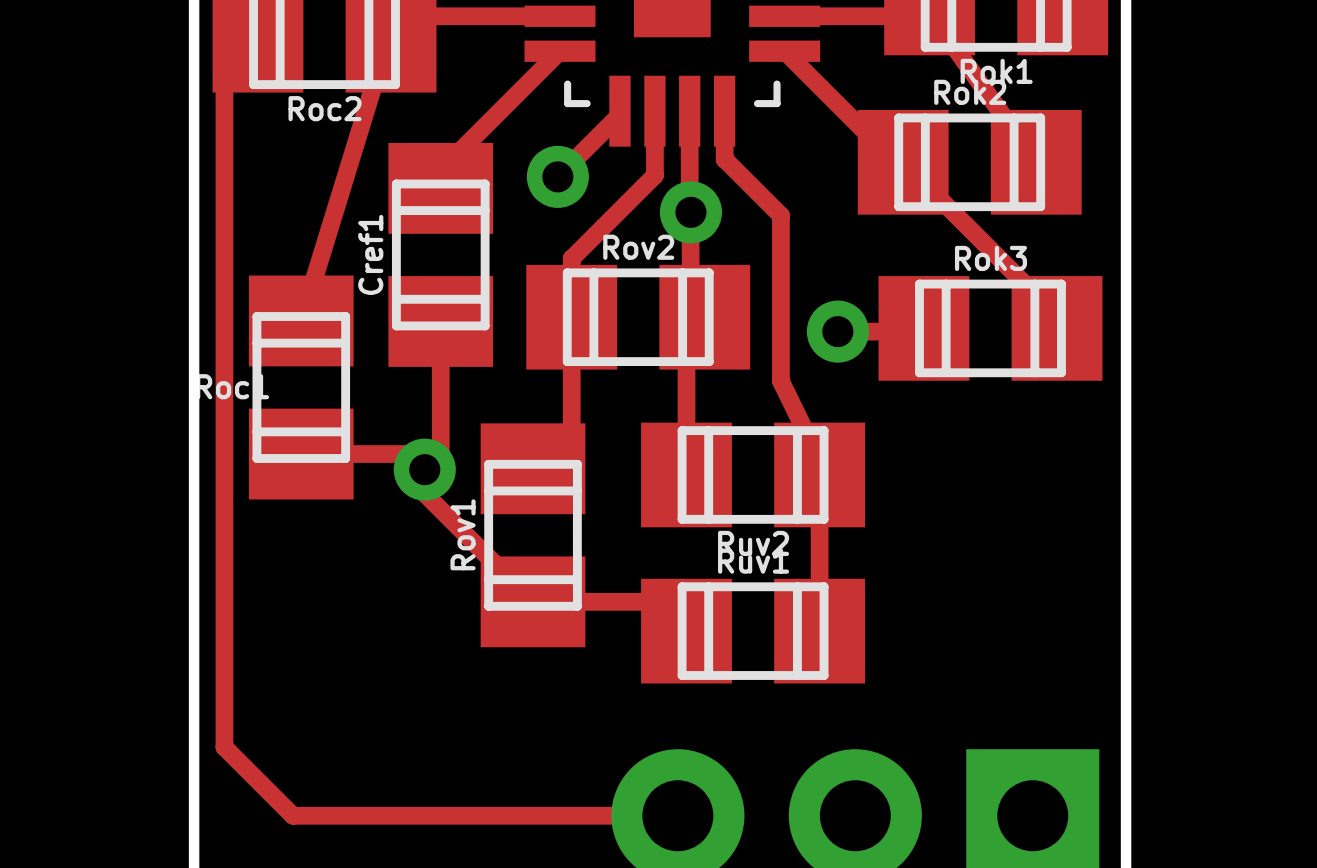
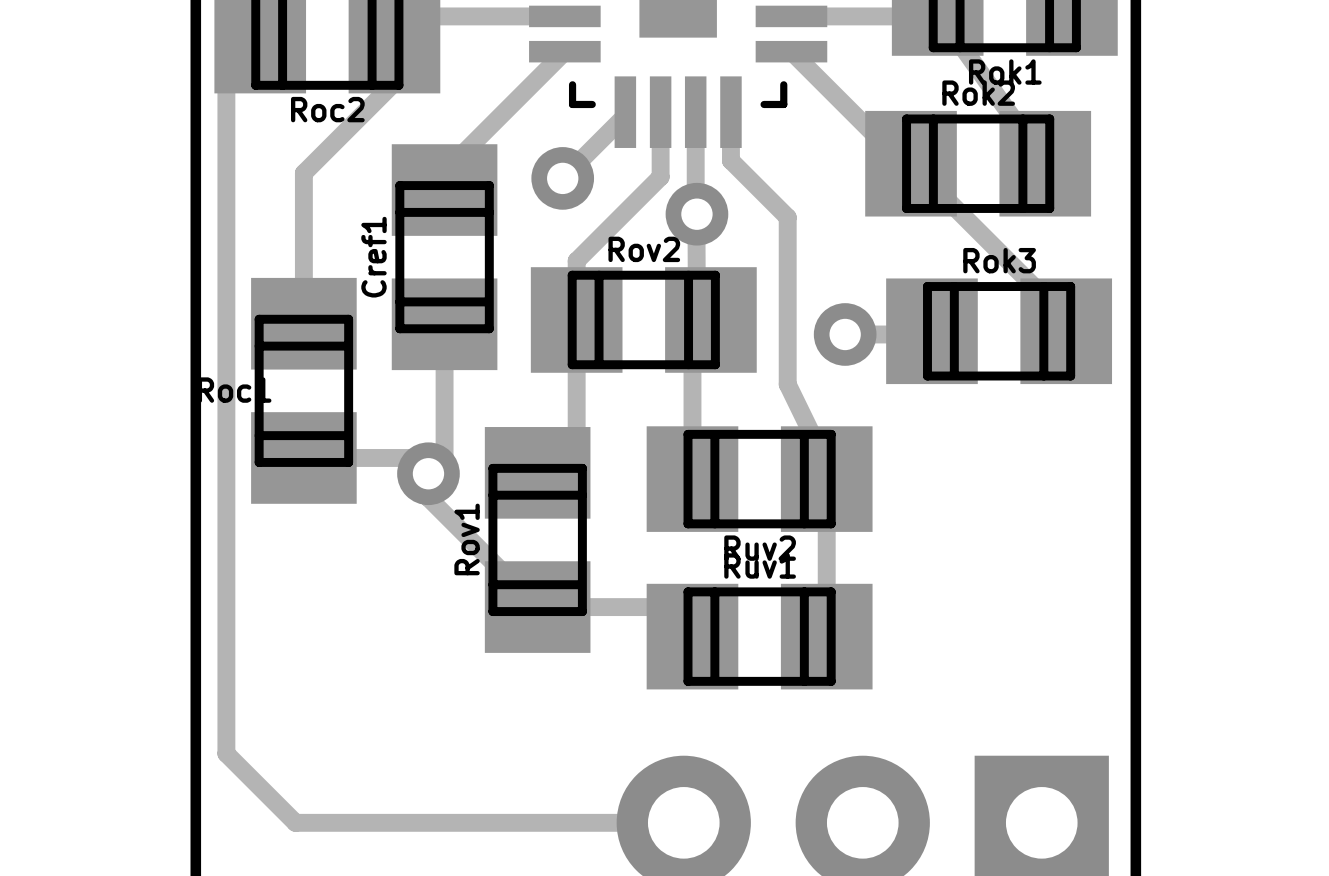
track: (389, 34) (301, 320) -> (394, 40) (394, 82) (303, 173) (303, 323)

